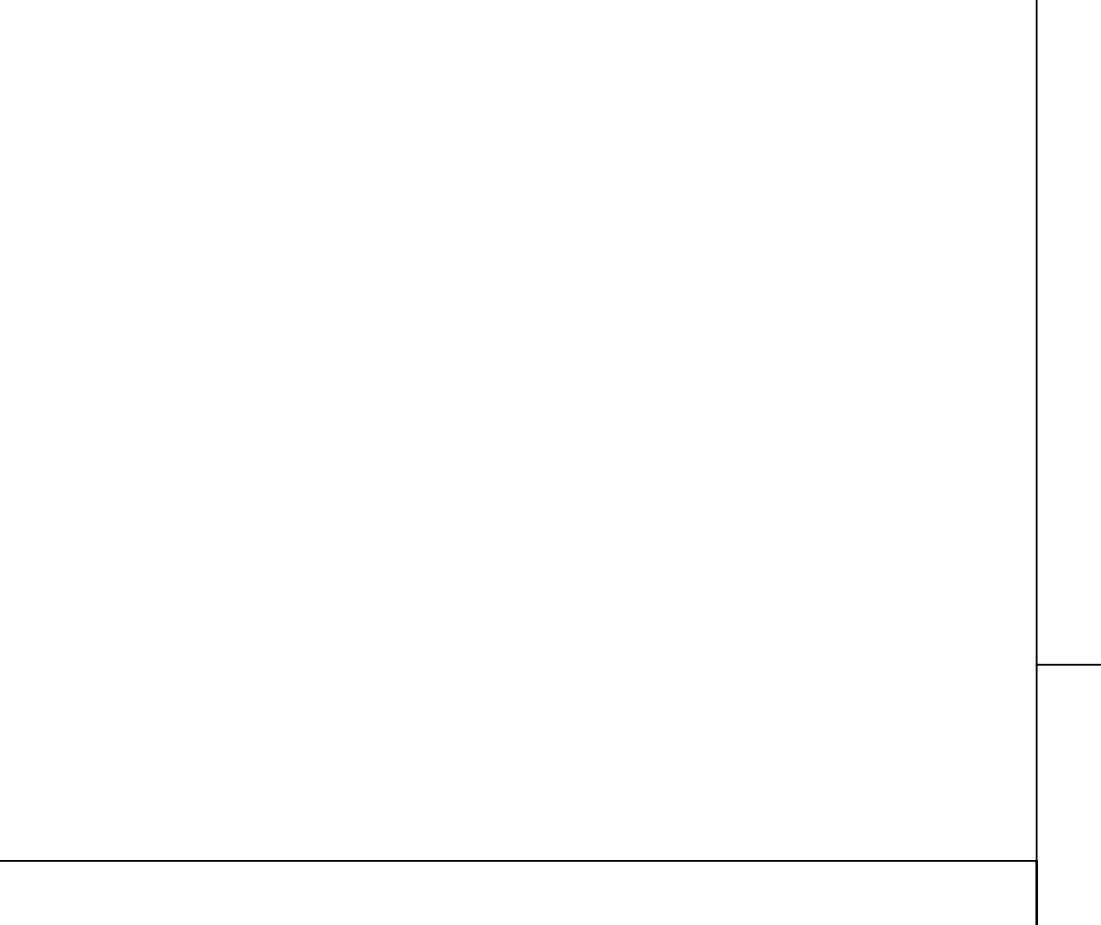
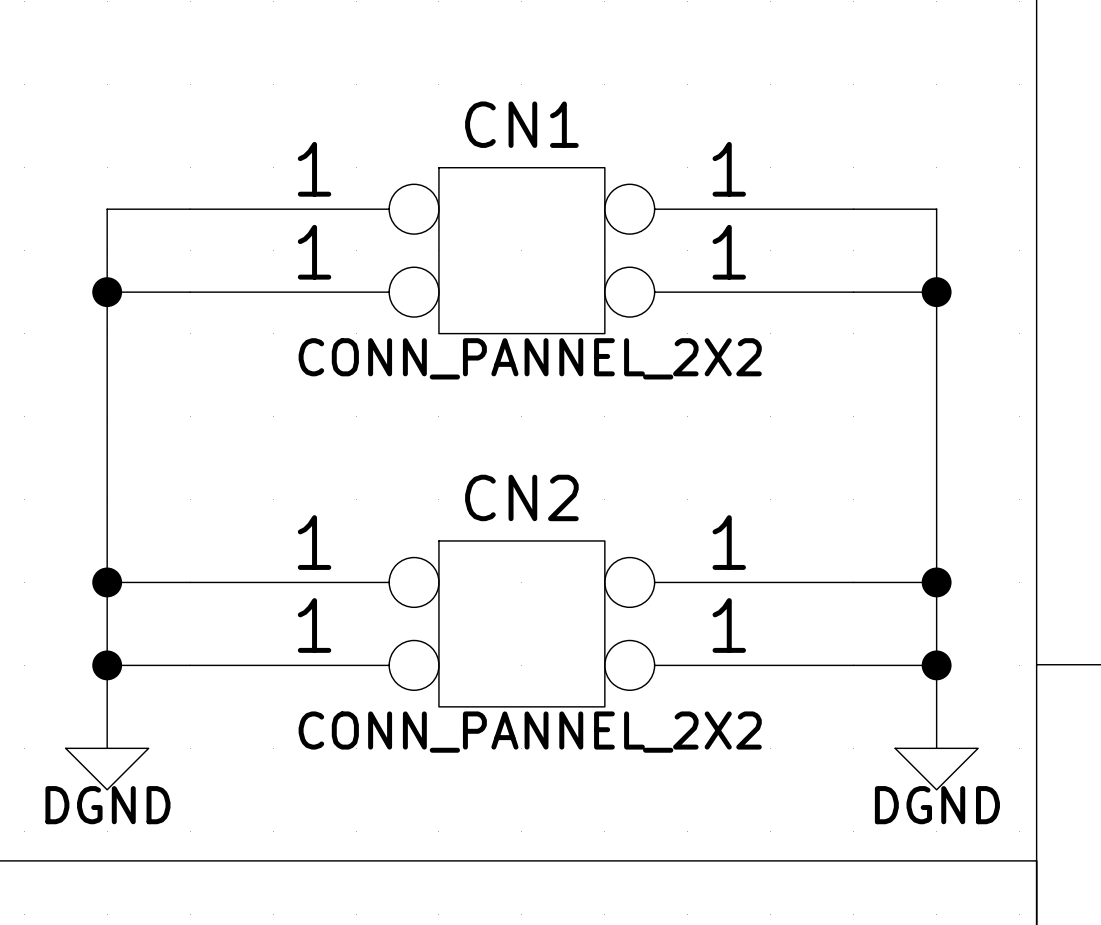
wire: none -> (190, 209) (107, 209) (107, 748)
wire: none -> (853, 209) (936, 209) (936, 748)
CN1: none -> CONN_PANNEL_2X2 (521, 250)
wire: none -> (107, 292) (190, 292)
junction: none -> (107, 292)
wire: none -> (853, 292) (936, 292)
junction: none -> (936, 292)
wire: none -> (107, 582) (190, 582)
junction: none -> (107, 582)
wire: none -> (853, 582) (936, 582)
junction: none -> (936, 582)
CN2: none -> CONN_PANNEL_2X2 (521, 623)
wire: none -> (107, 665) (190, 665)
junction: none -> (107, 665)
wire: none -> (853, 665) (936, 665)
junction: none -> (936, 665)
power symbol: none -> DGND (107, 769)
power symbol: none -> DGND (936, 769)

